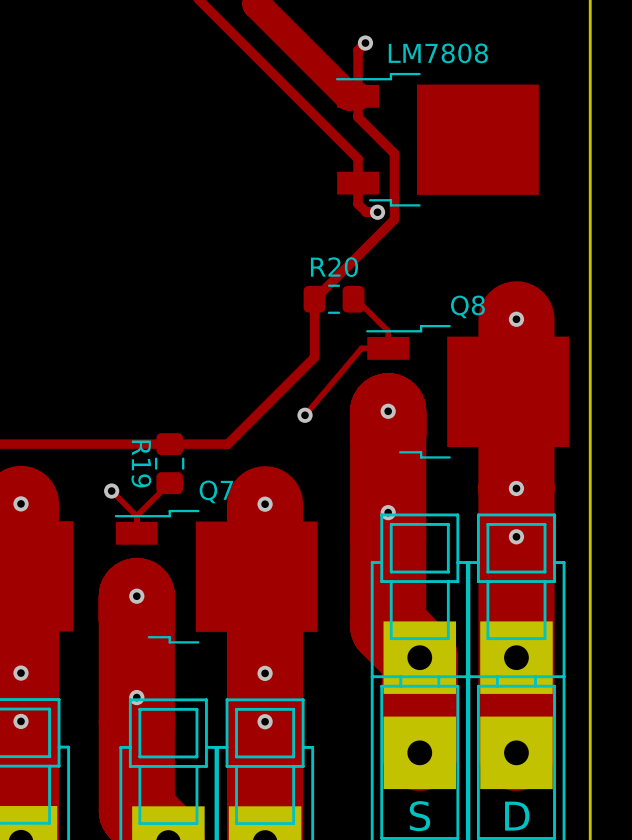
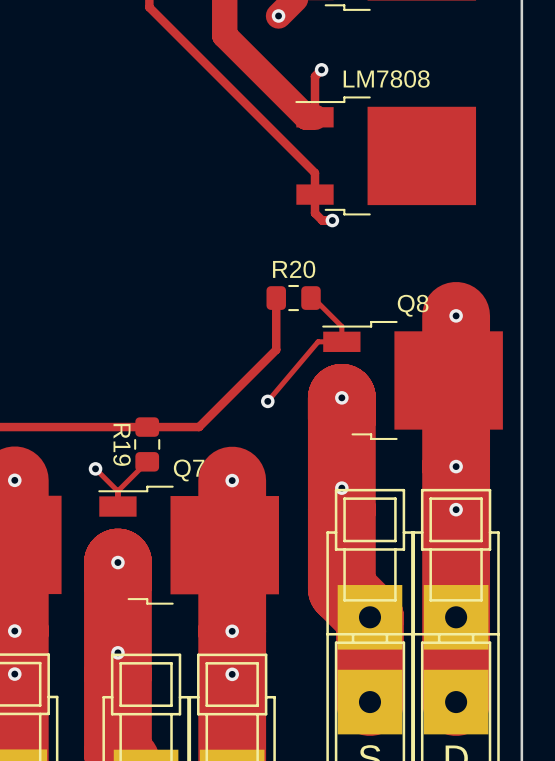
track: (358, 96) (358, 117) (394, 153) (394, 219) (314, 299) -> none

